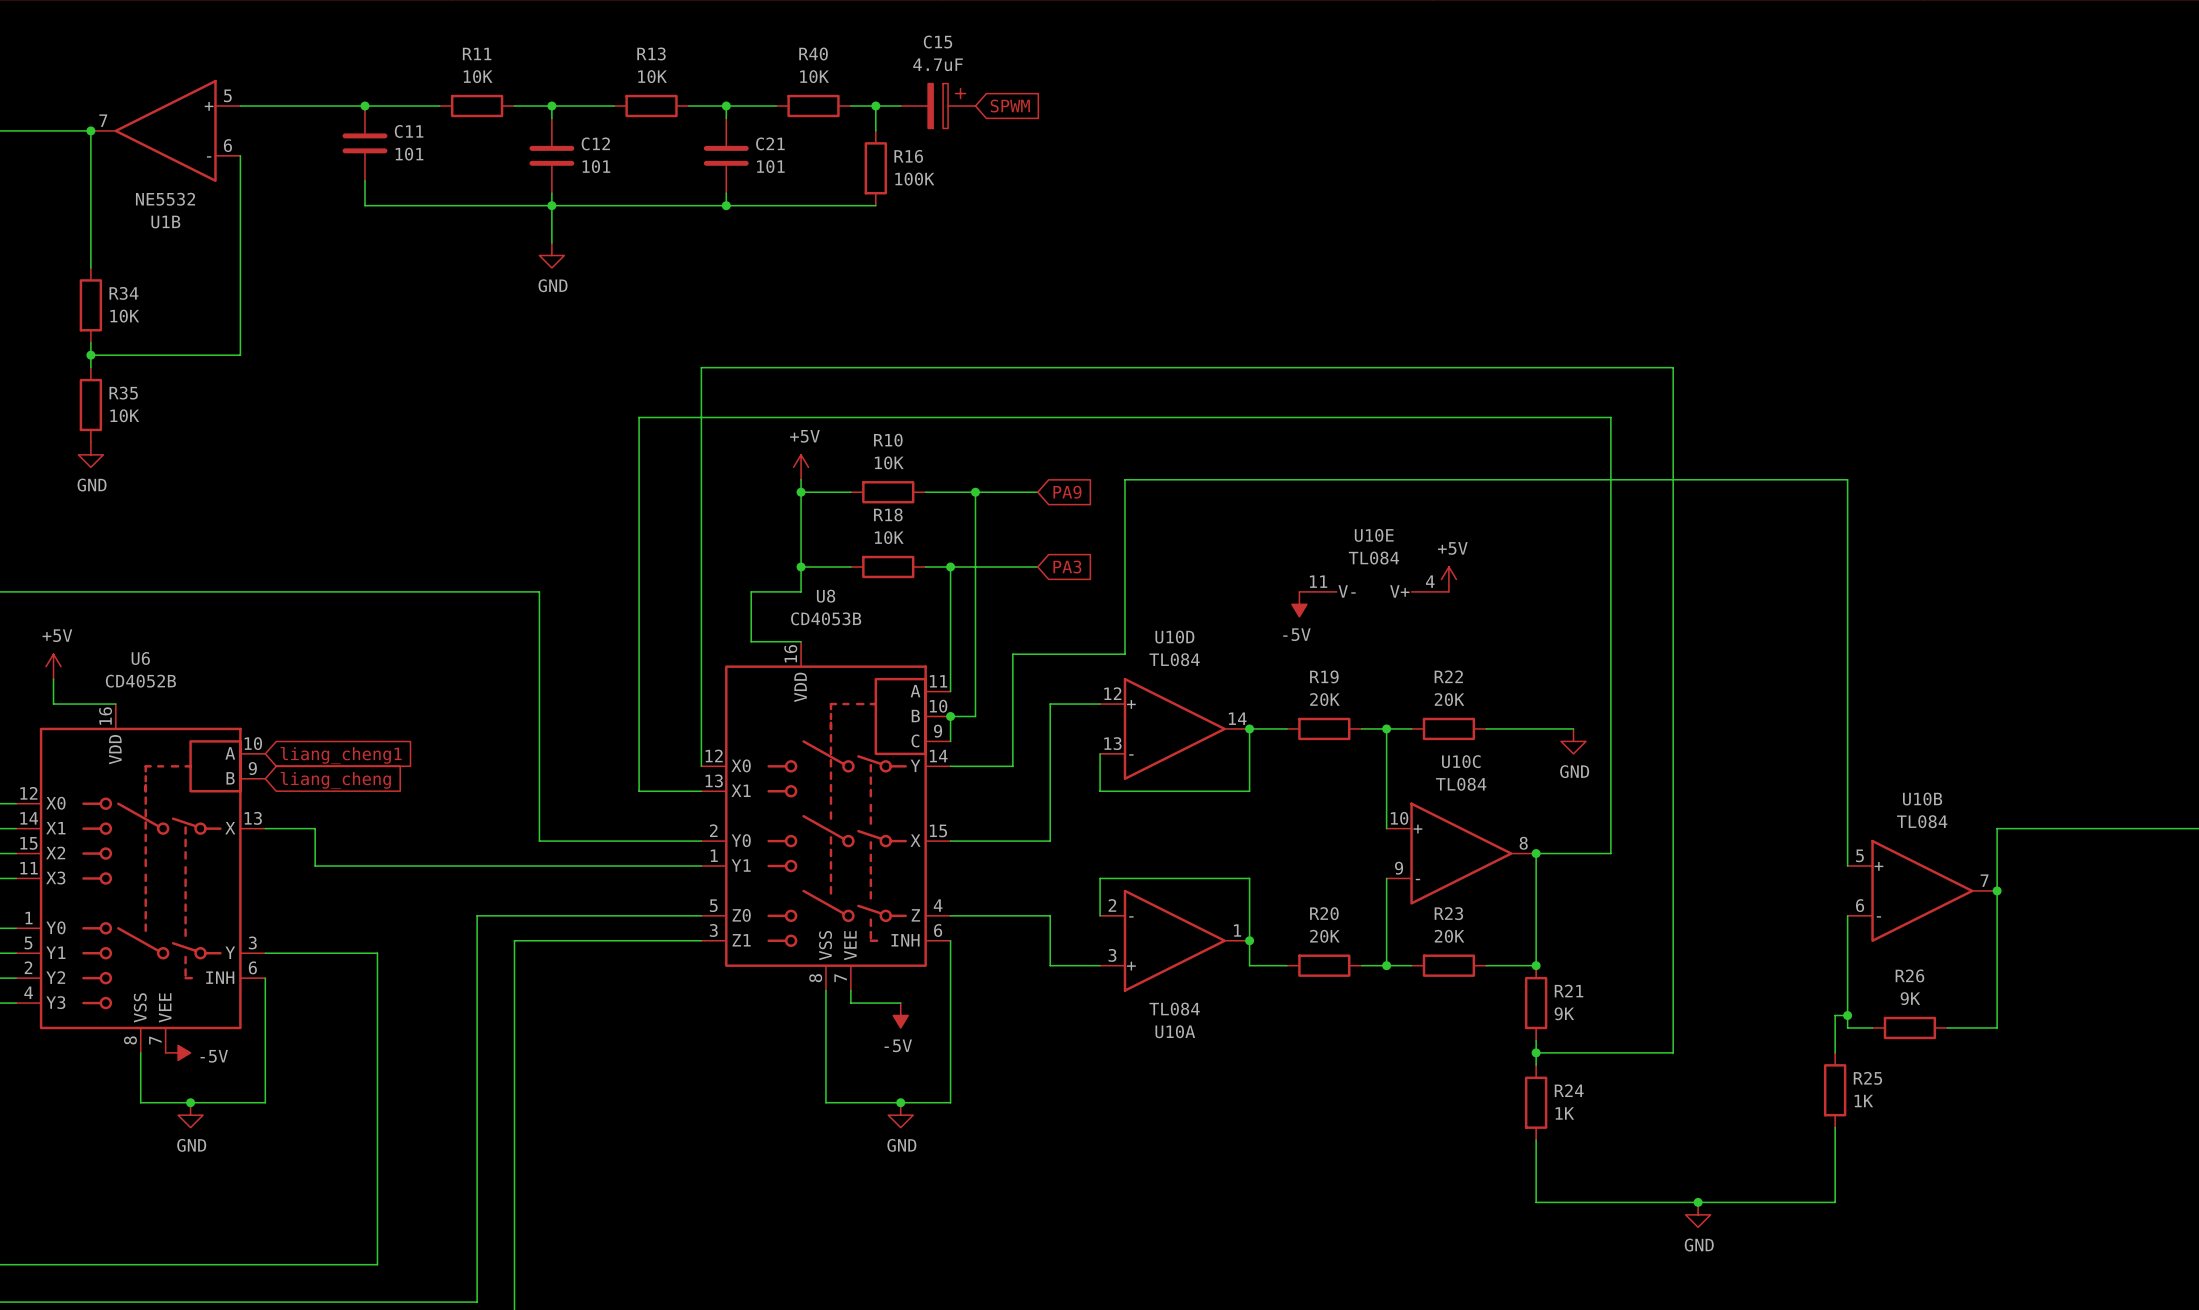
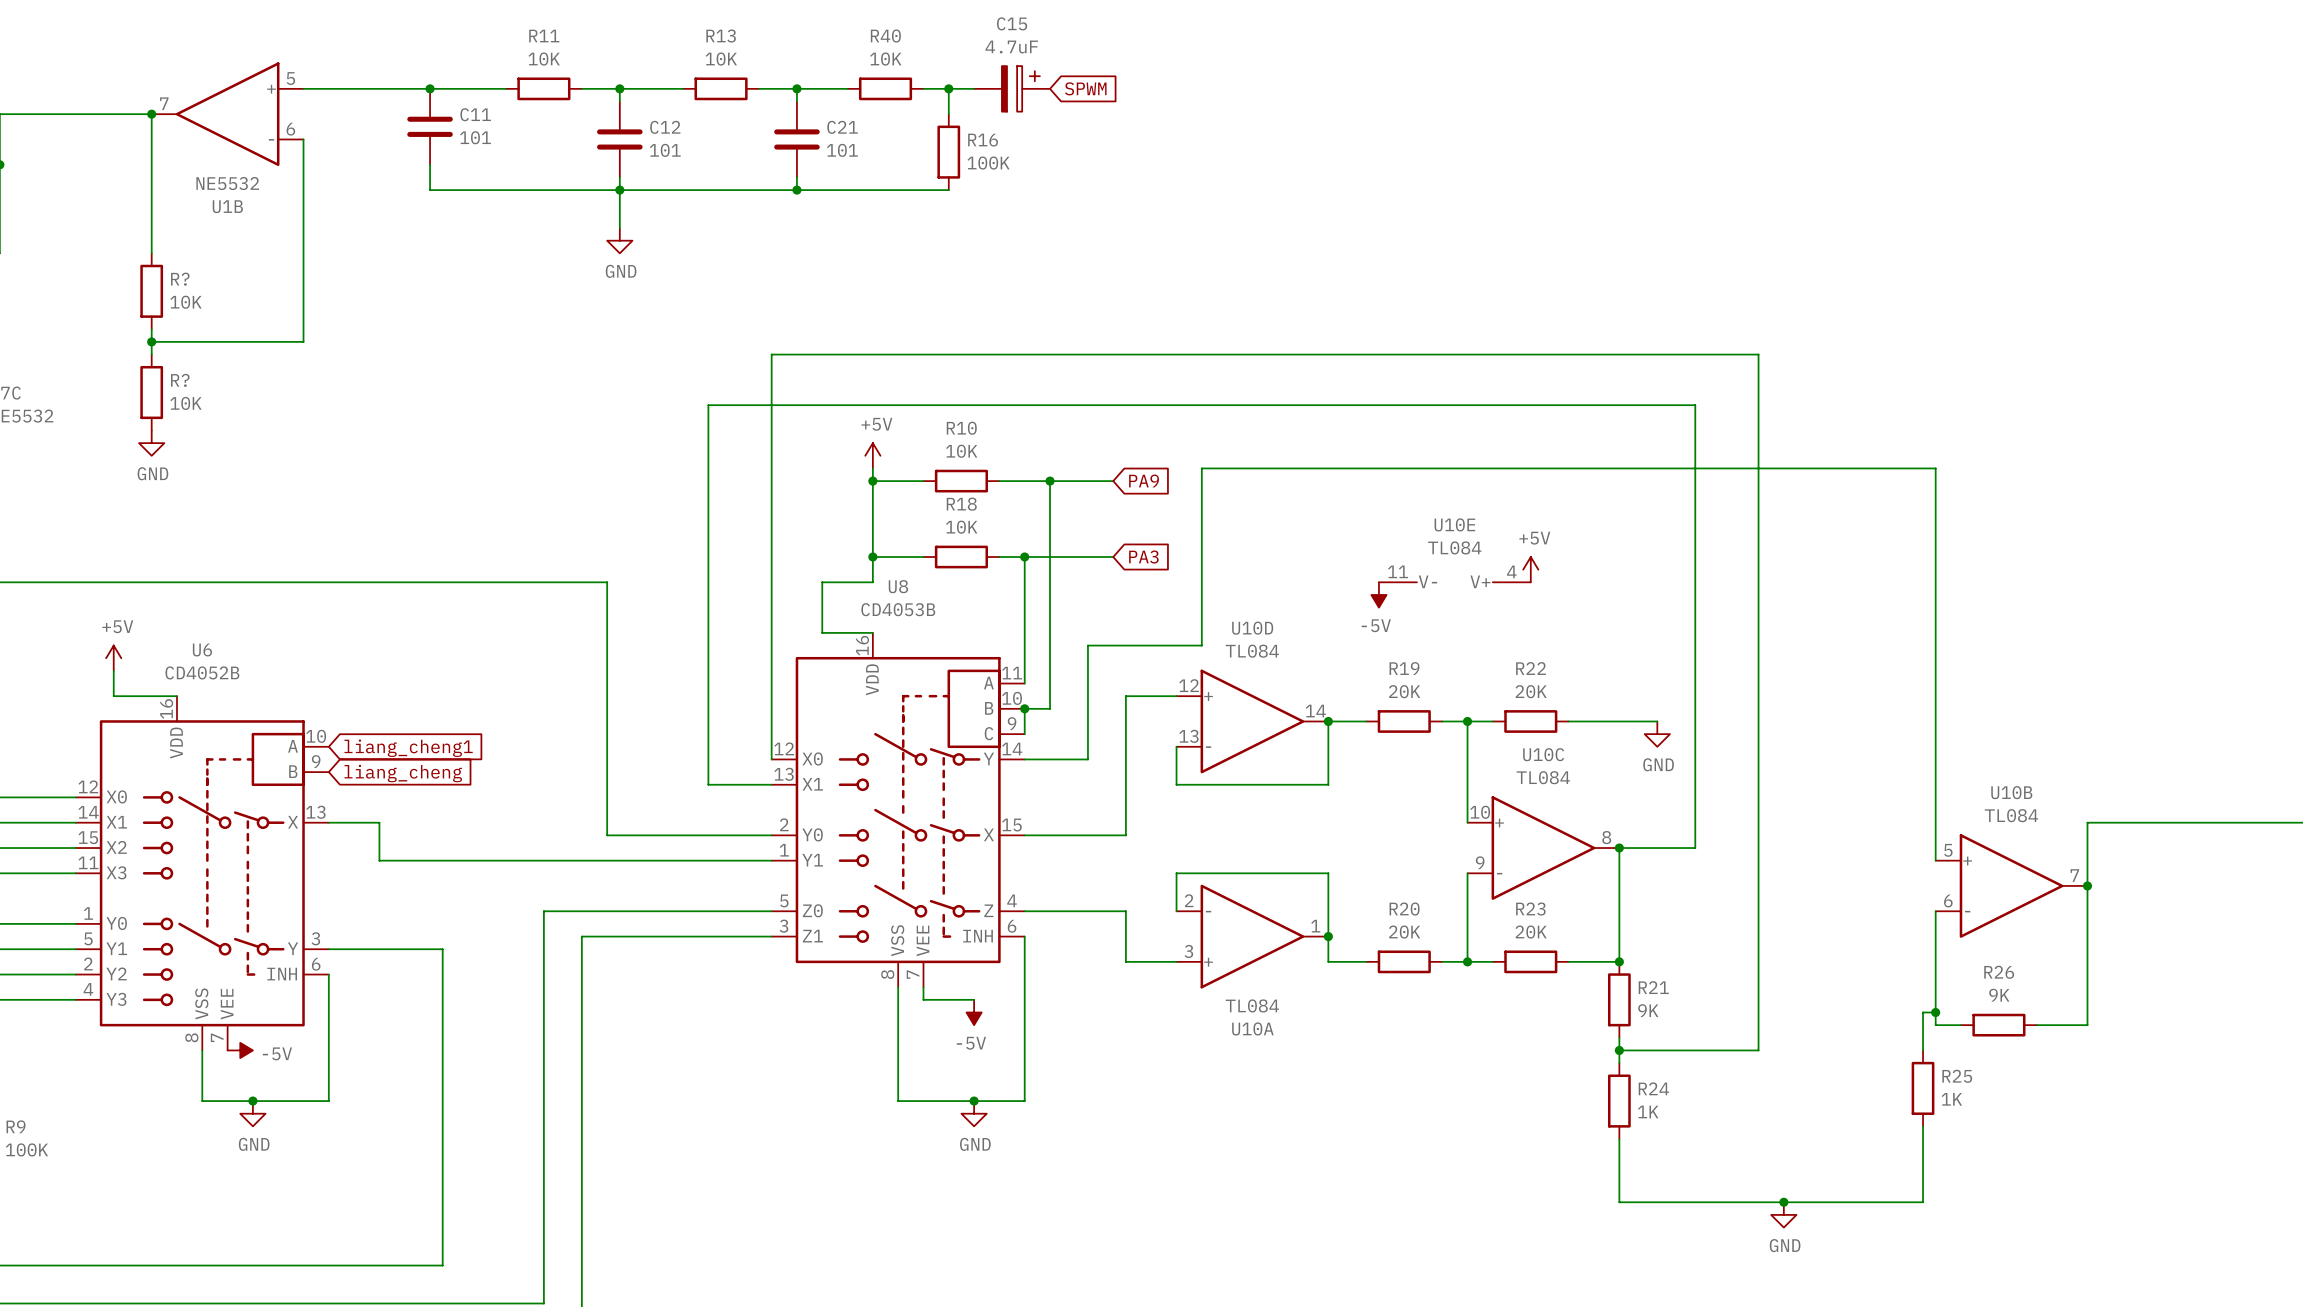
R34 name: R34 (123, 293) -> R? (180, 279)
R35 name: R35 (123, 393) -> R? (180, 380)

